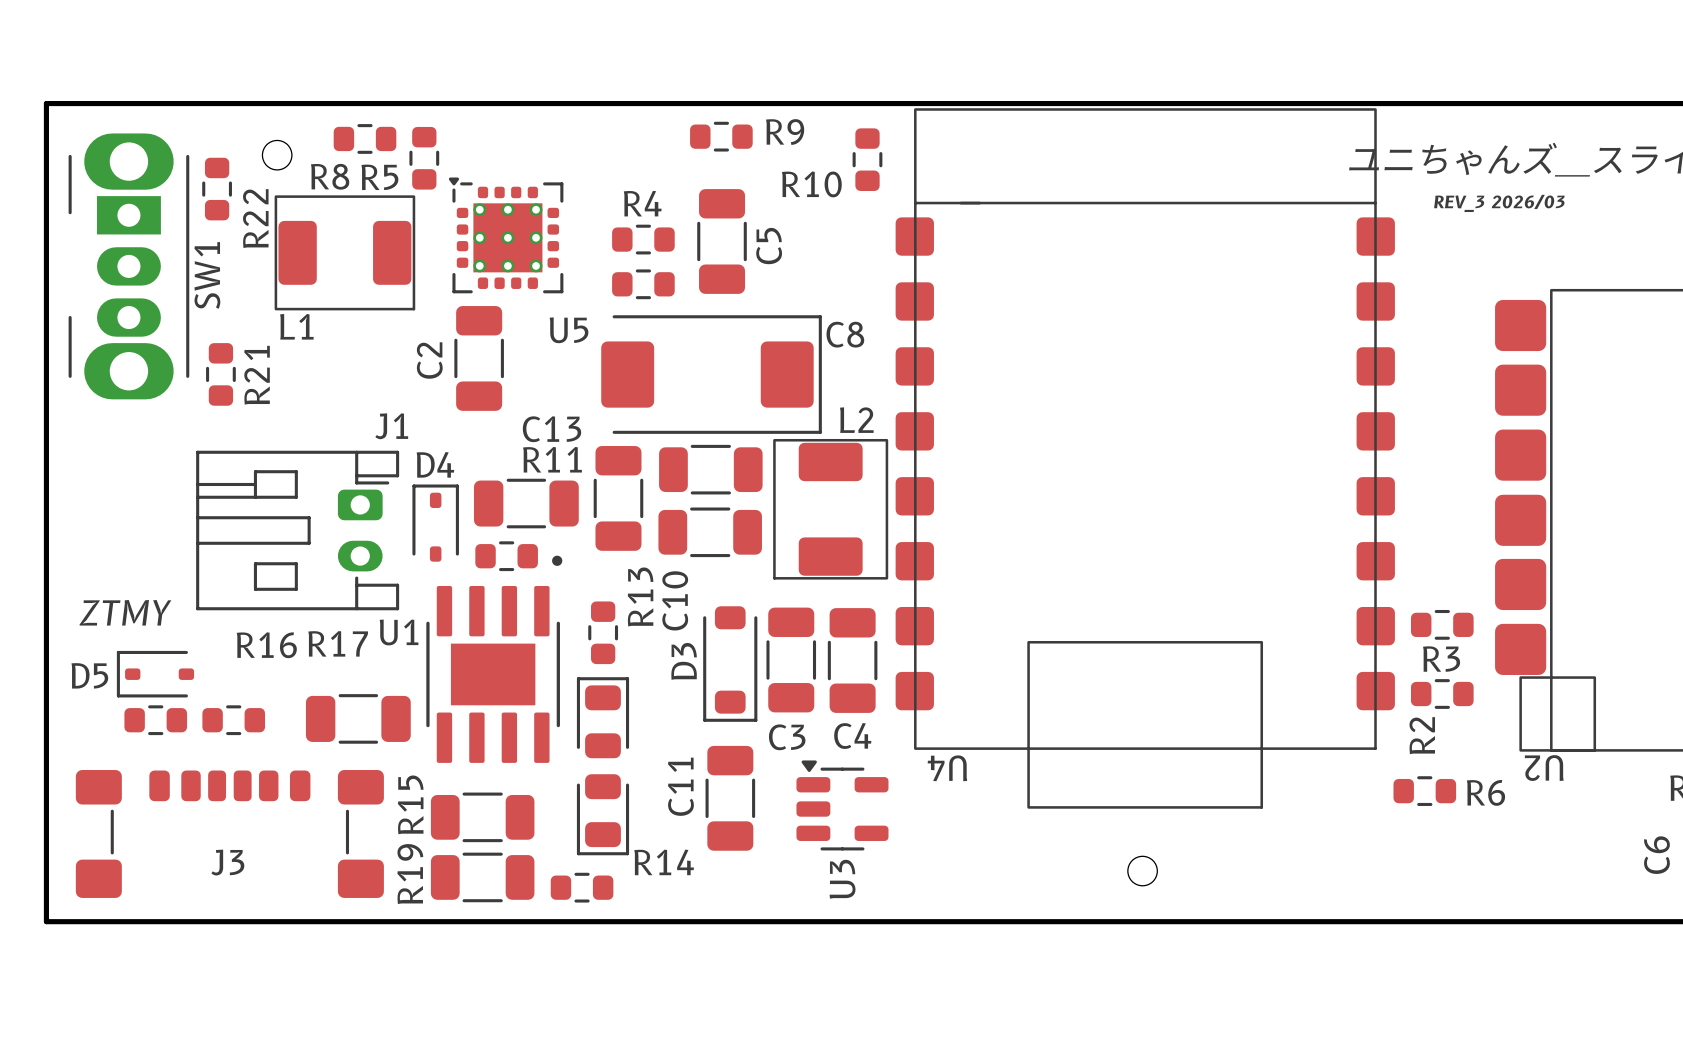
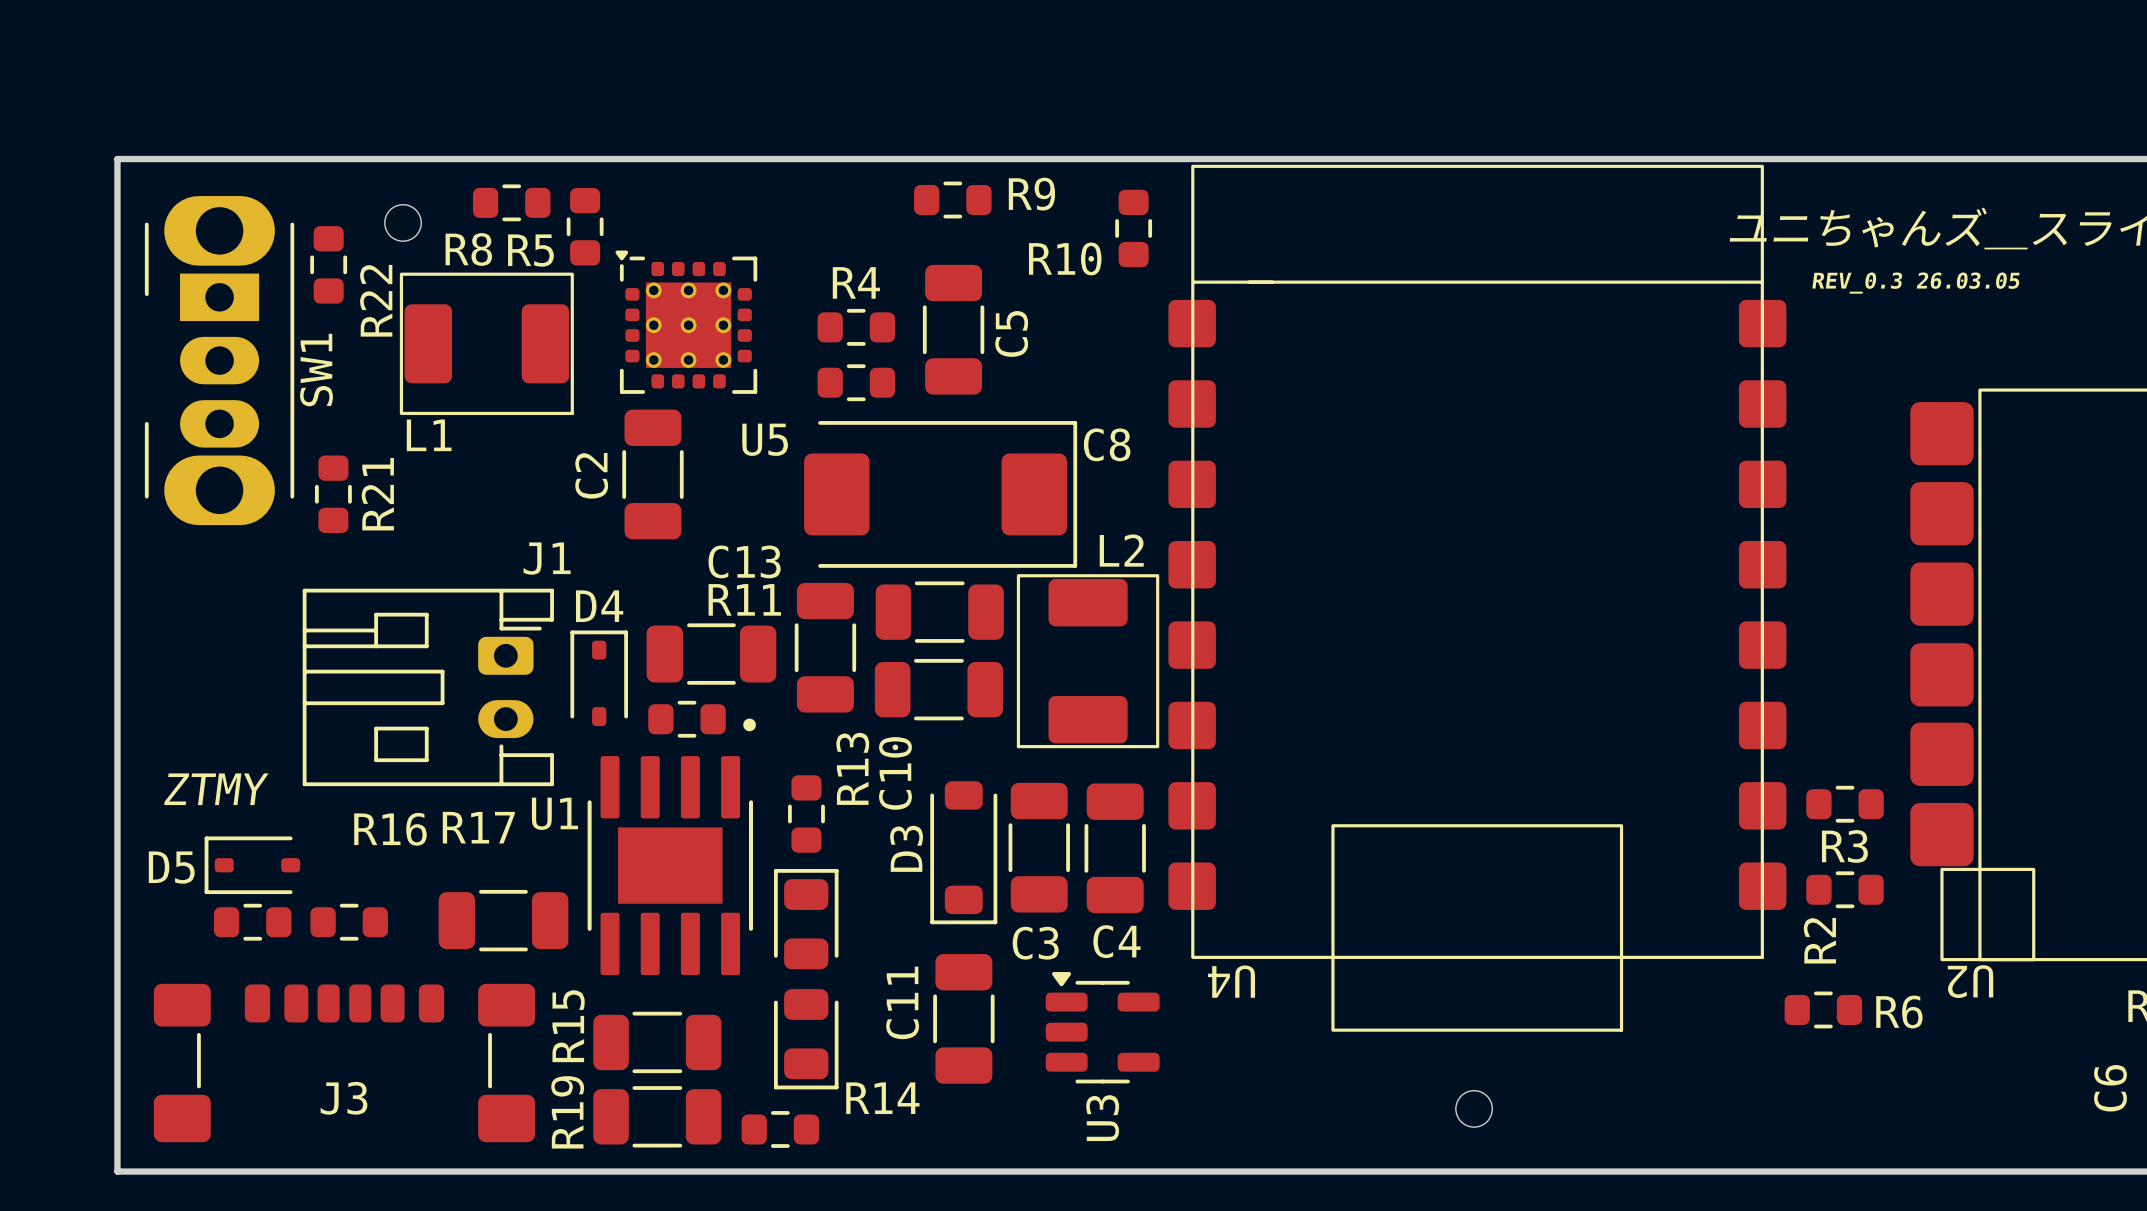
text: REV_3 2026/03 (1499, 203) -> REV_0.3 26.03.05 (1915, 283)

